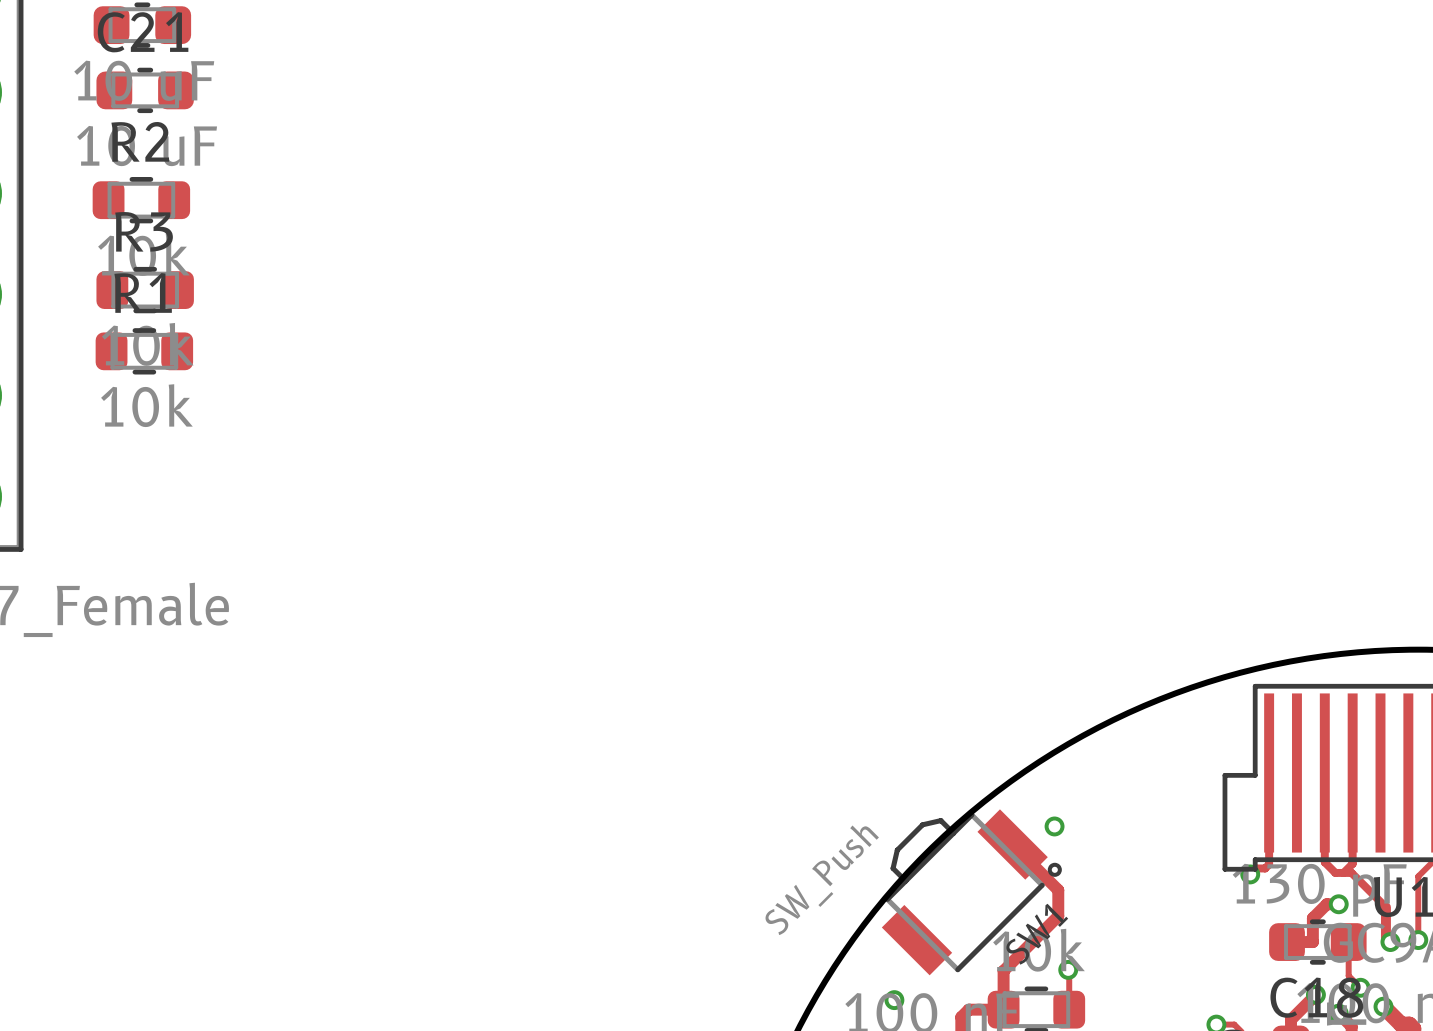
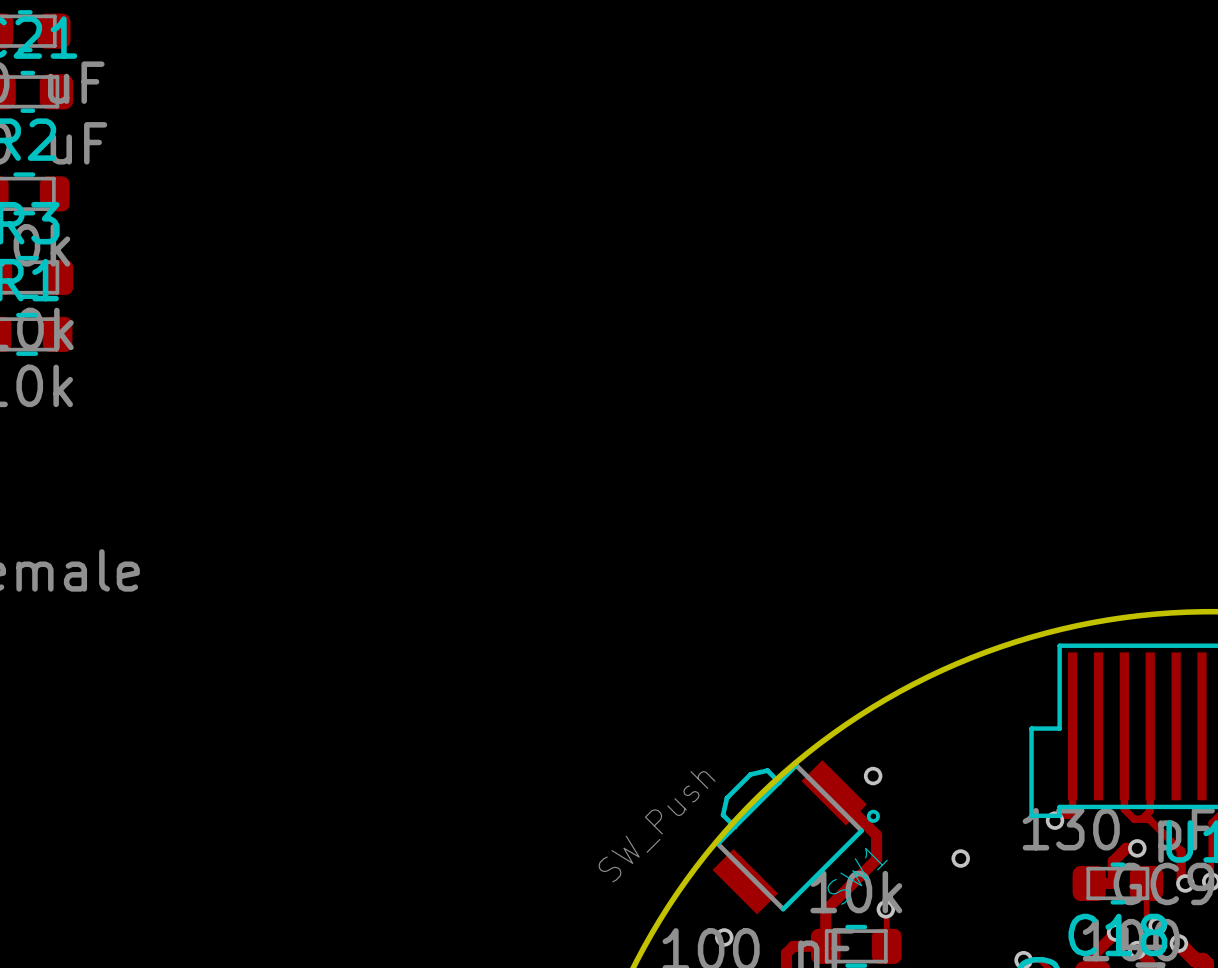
via: none -> (960, 858)

